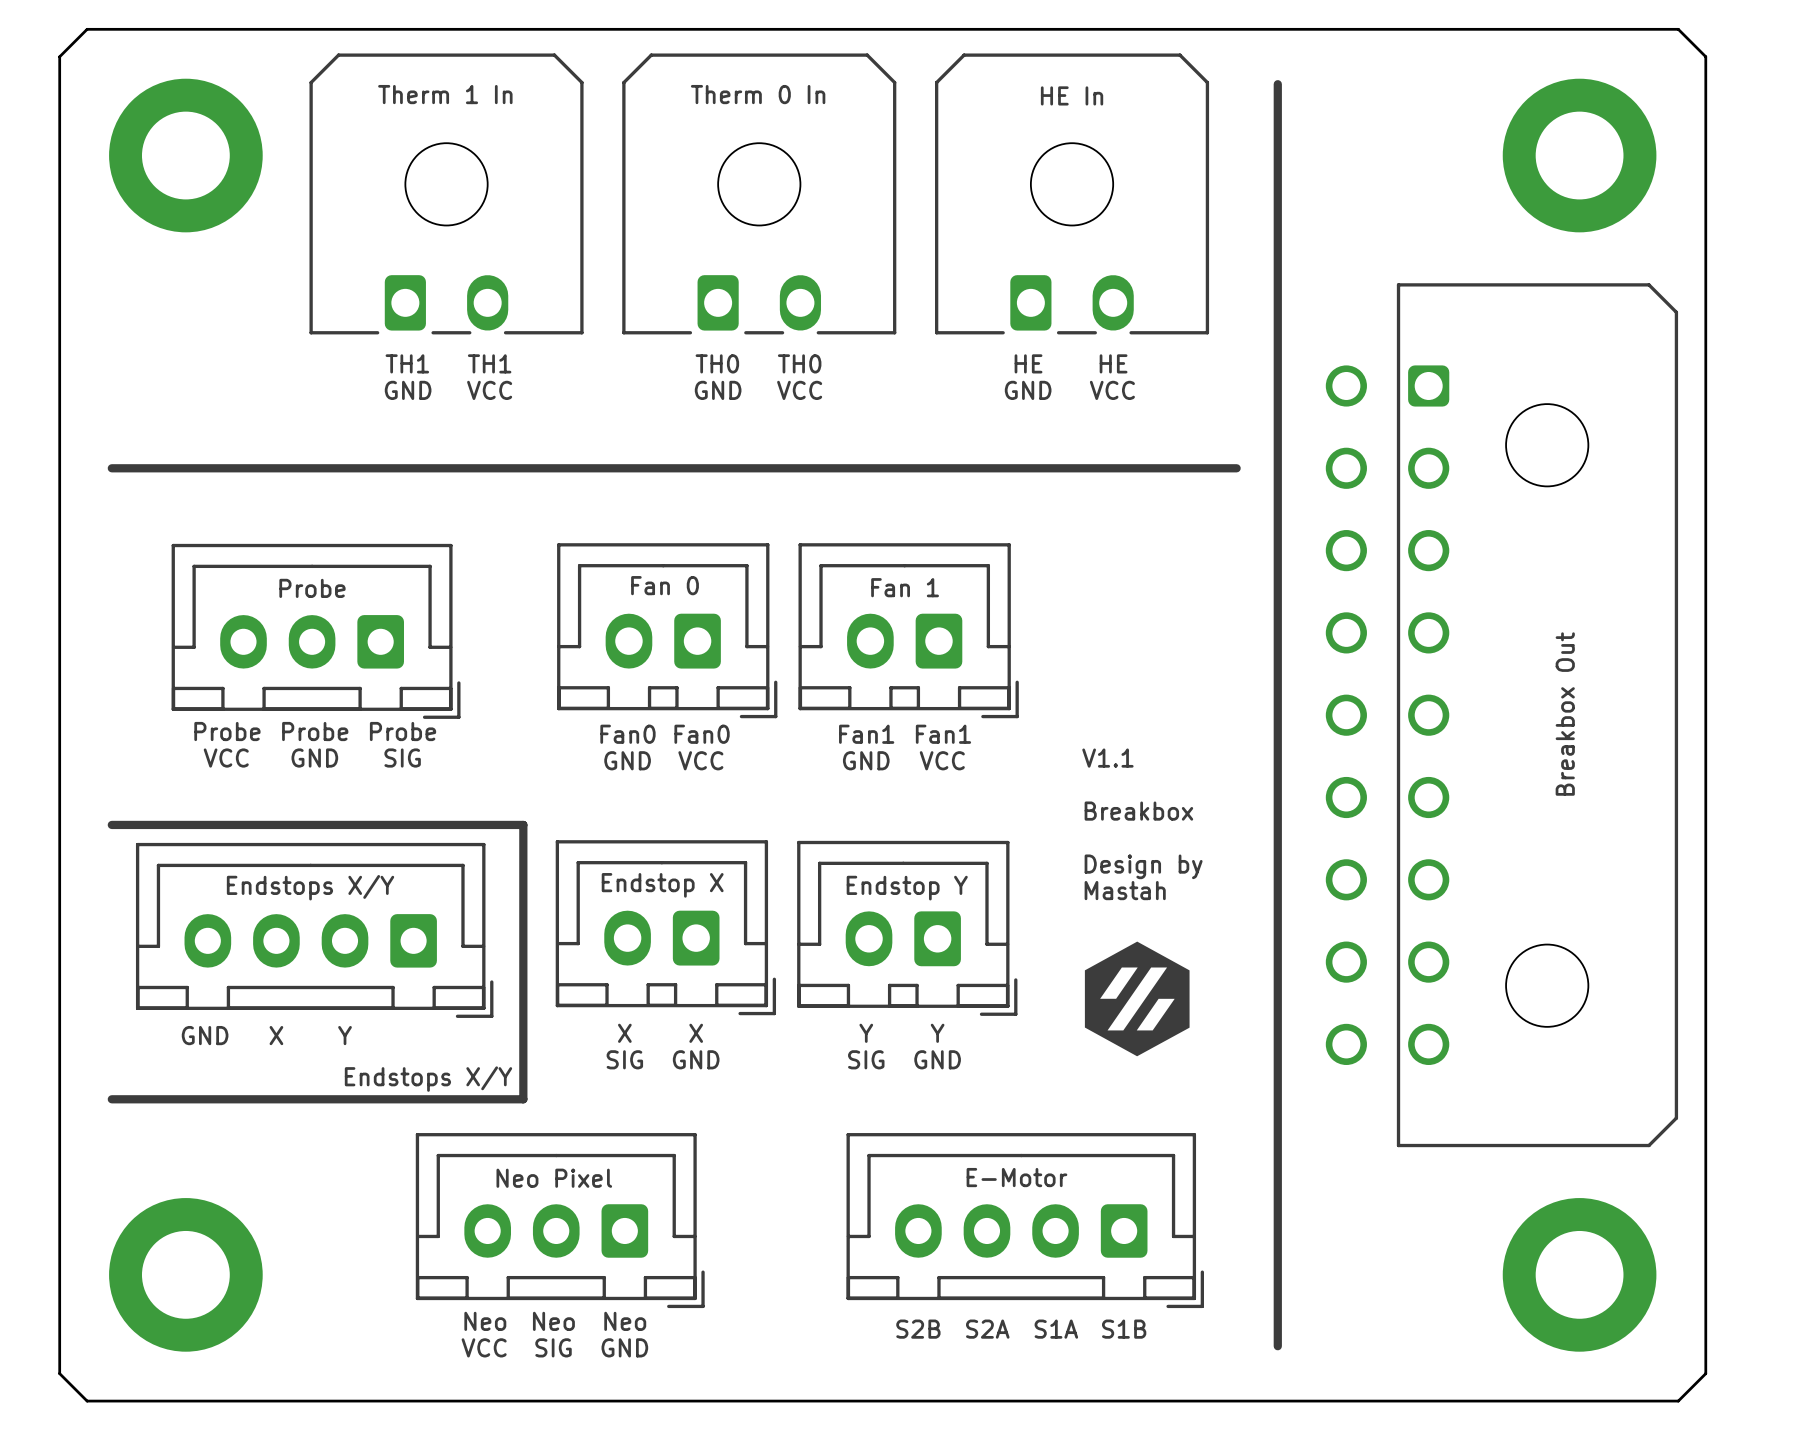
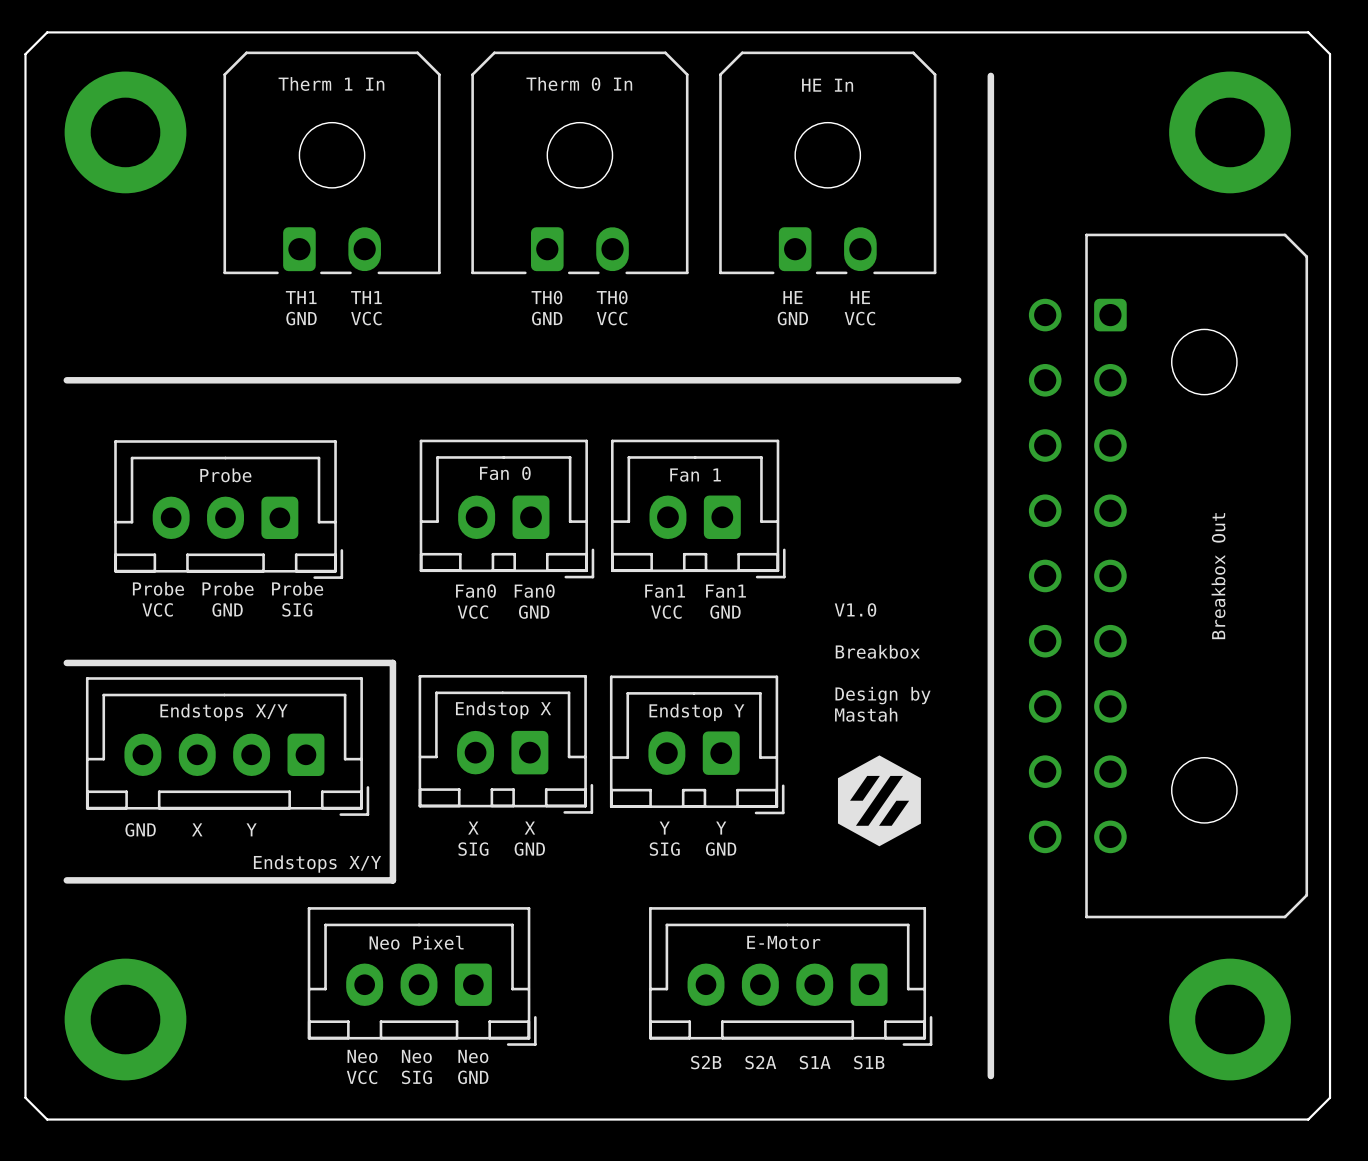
text: V1.1 (1107, 758) -> V1.0 (855, 609)
text: GND (627, 760) -> VCC (472, 612)
text: VCC (700, 760) -> GND (534, 612)
text: GND (866, 760) -> VCC (666, 612)
text: VCC (942, 760) -> GND (725, 612)

